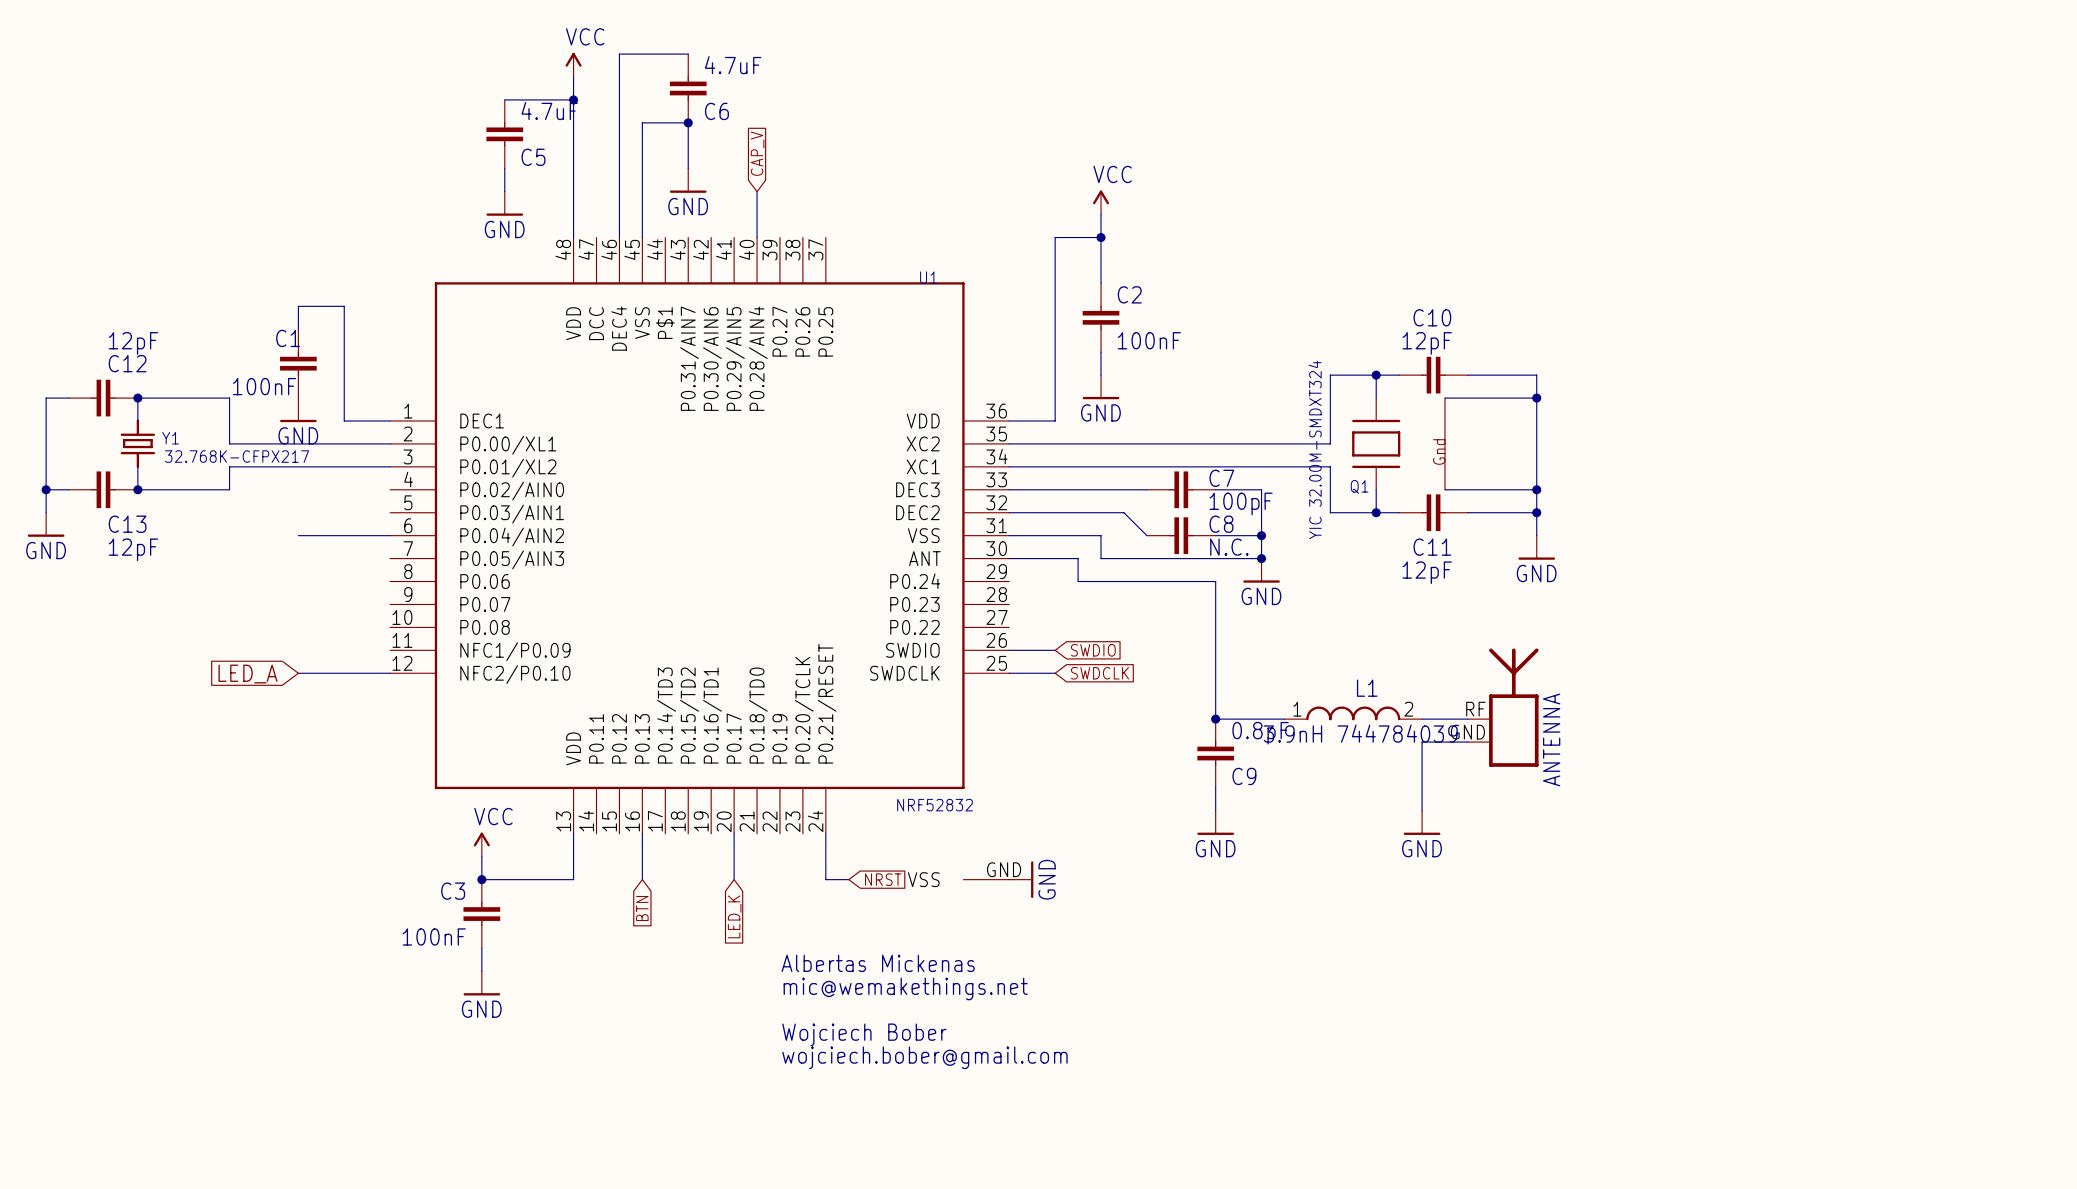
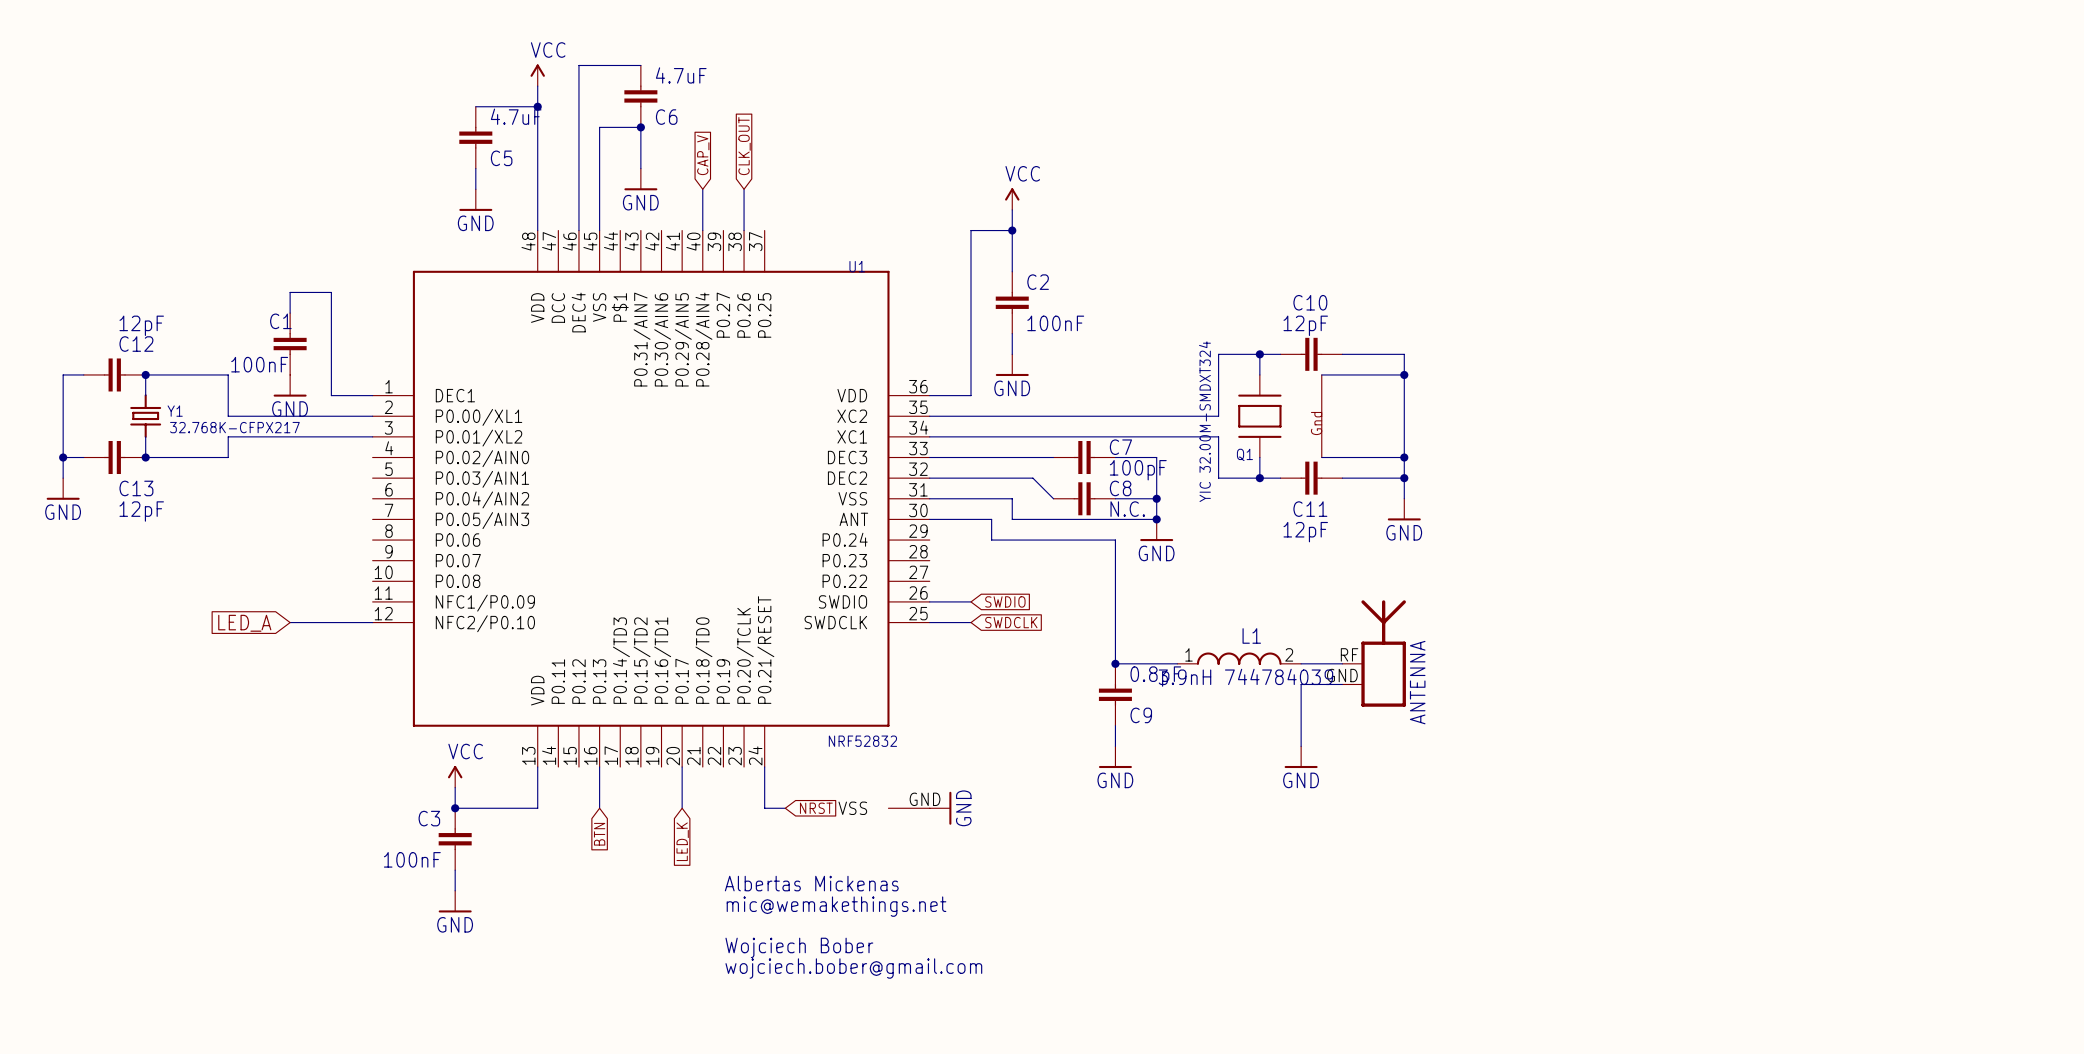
global label: none -> CLK_OUT (744, 146)
wire: none -> (744, 189) (744, 230)
wire: (298, 535) (390, 535) -> none

